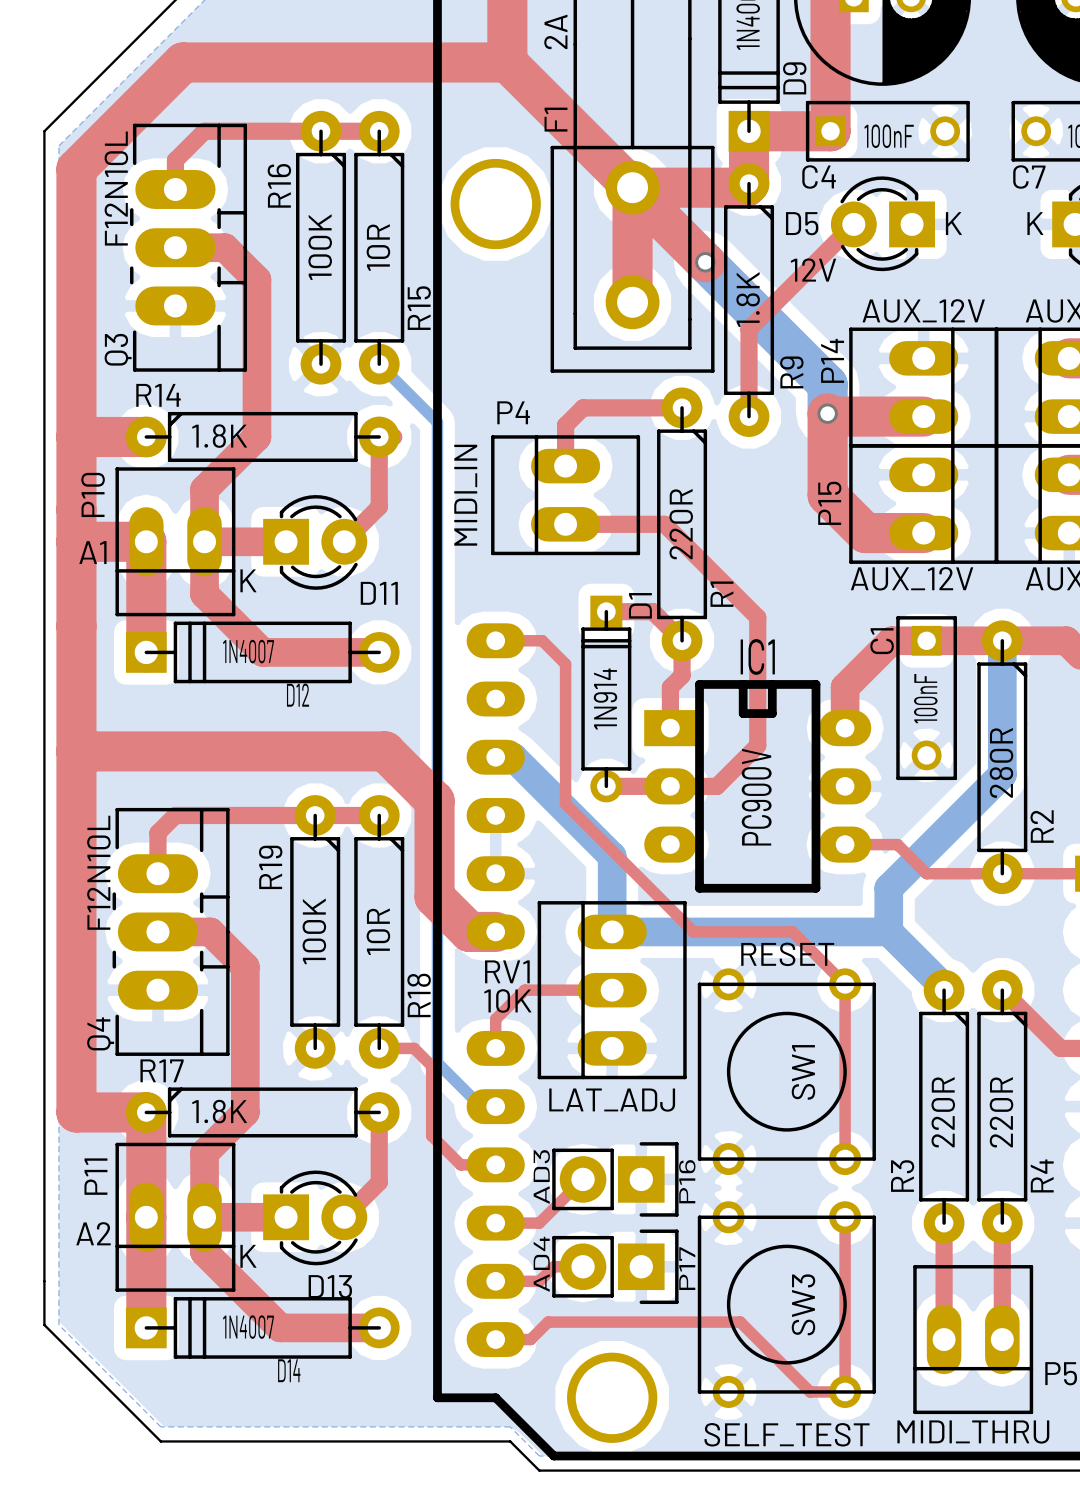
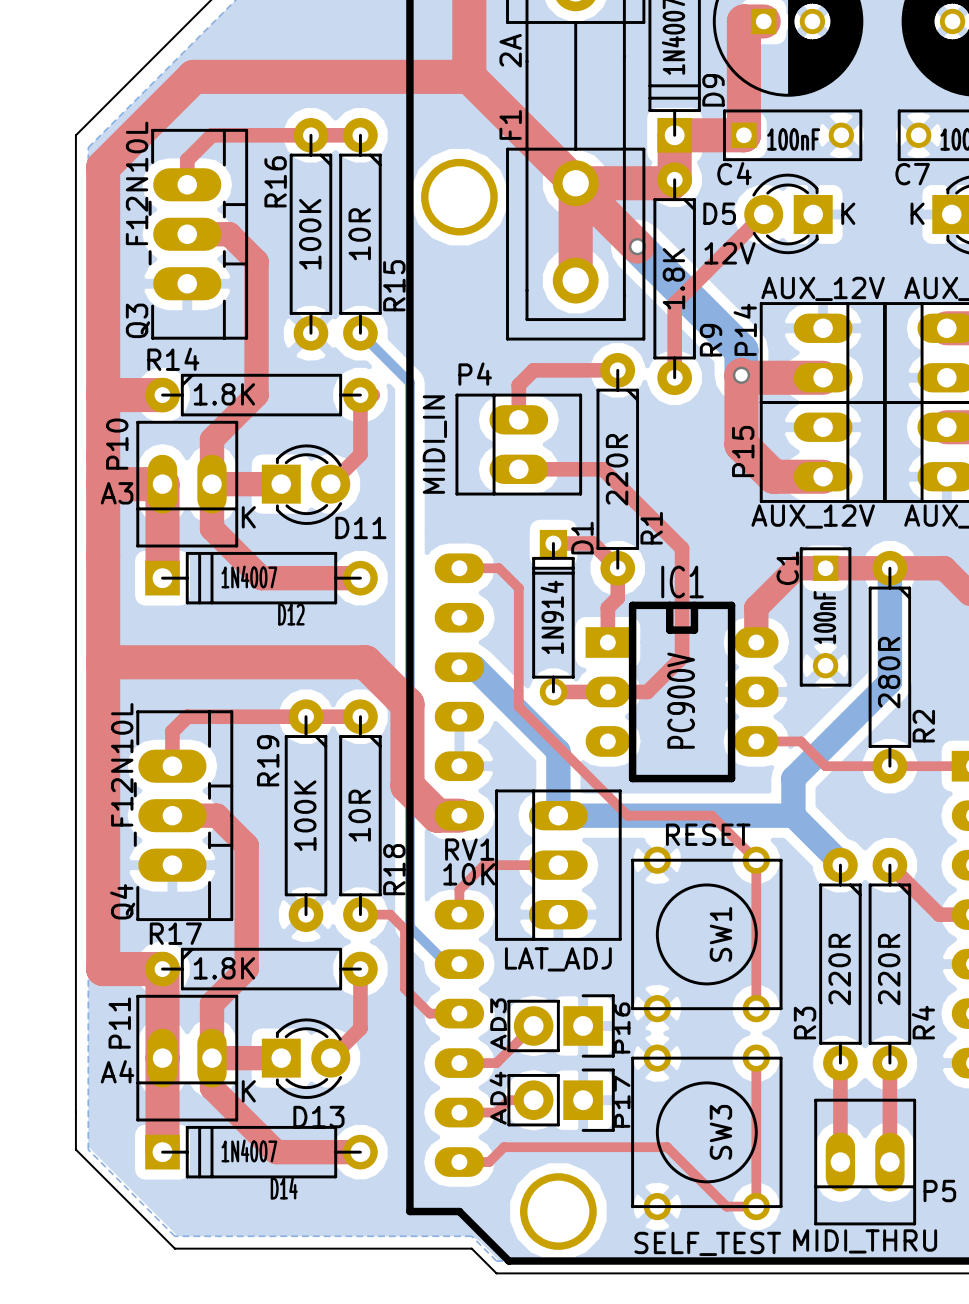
P10 value: A1 (92, 552) -> A3 (117, 493)
P11 value: A2 (93, 1233) -> A4 (117, 1071)

